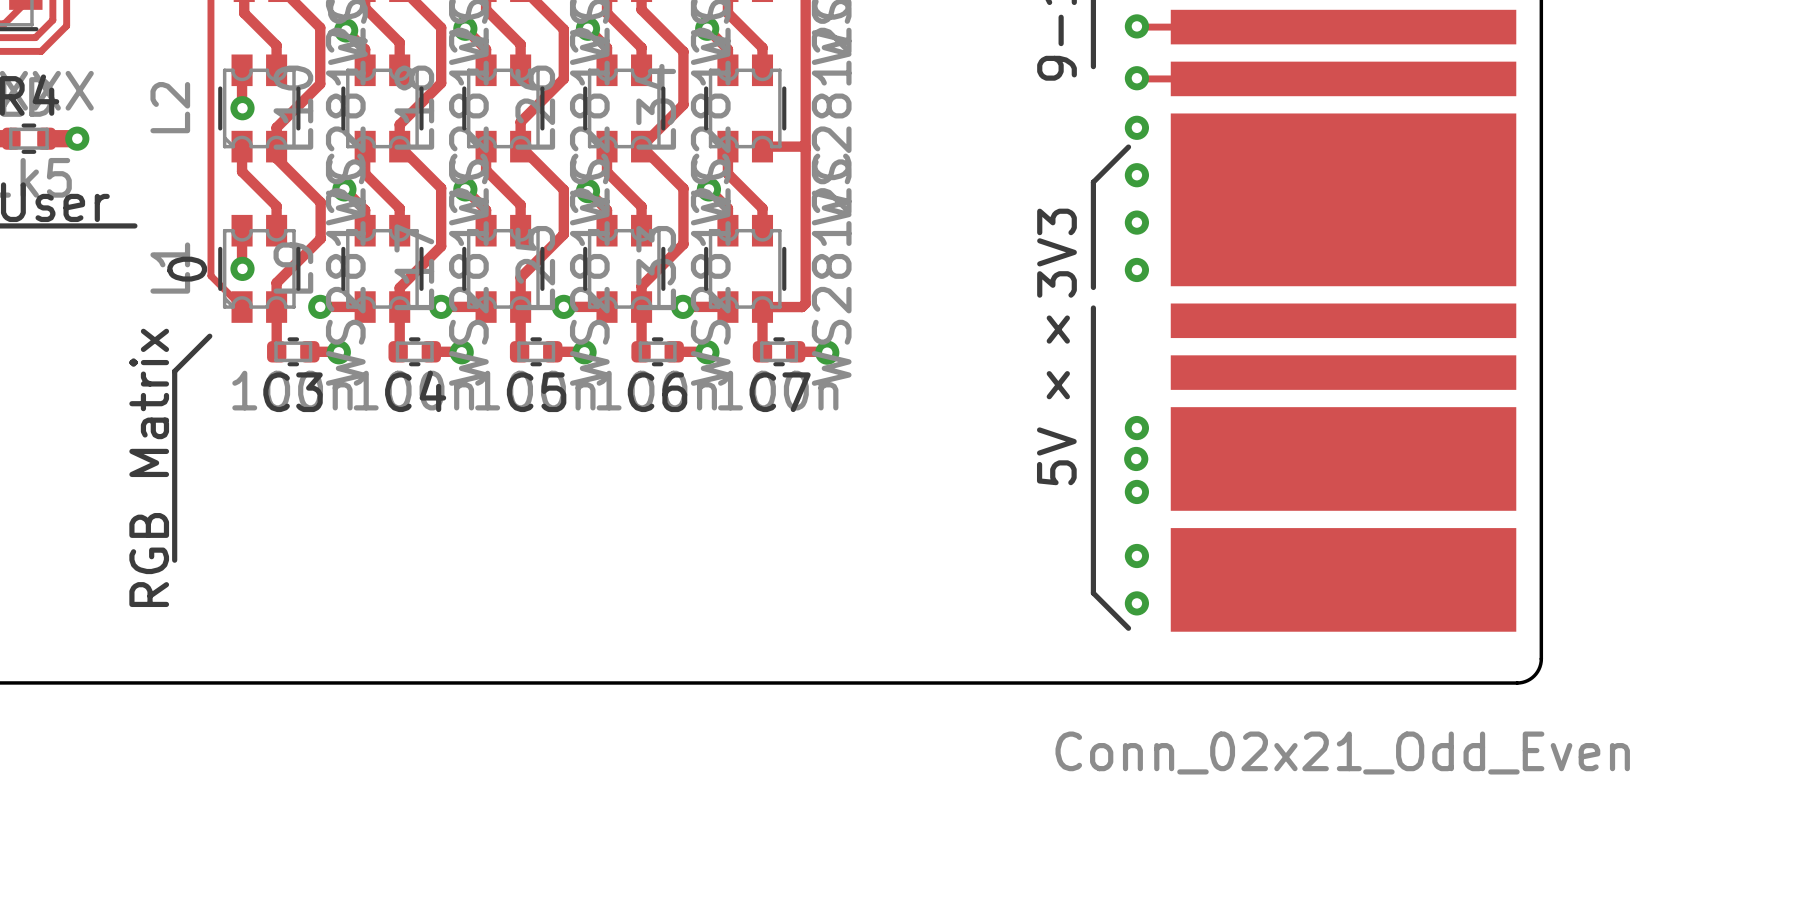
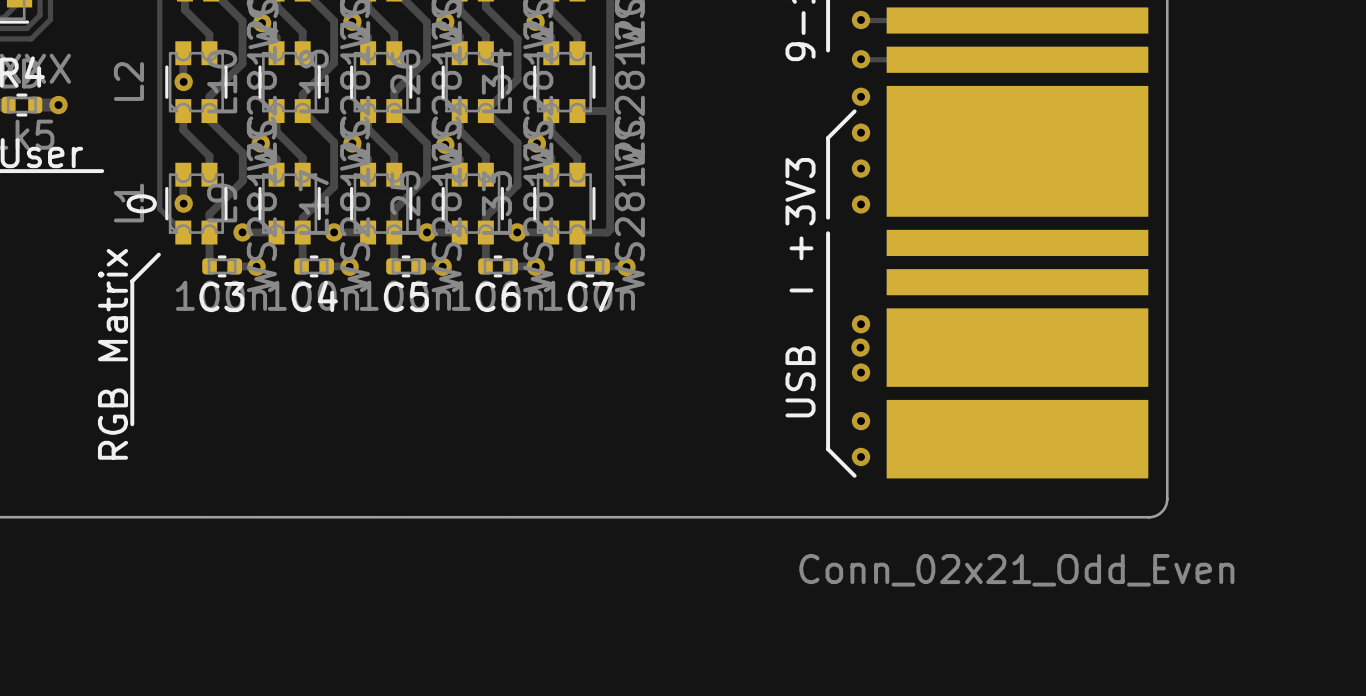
text: x (1058, 329) -> + (801, 248)
text: x (1058, 385) -> - (801, 290)
text: 5V (1056, 456) -> none
text: none -> USB (800, 381)

